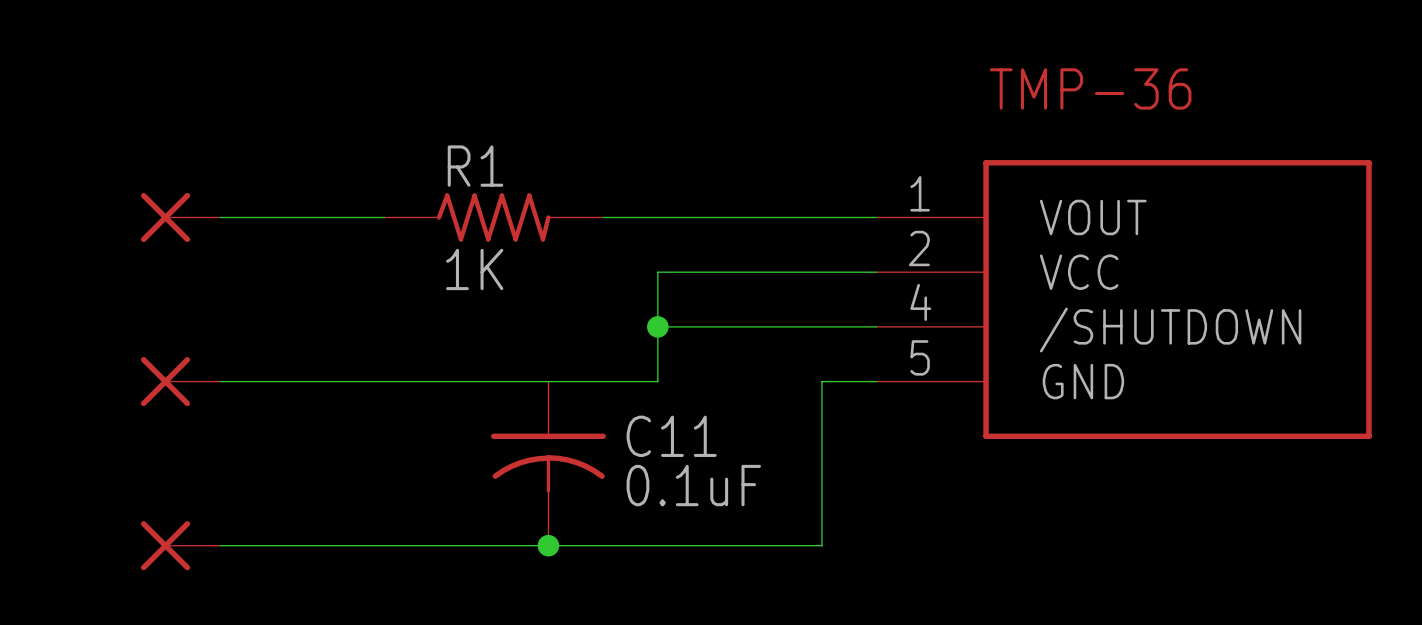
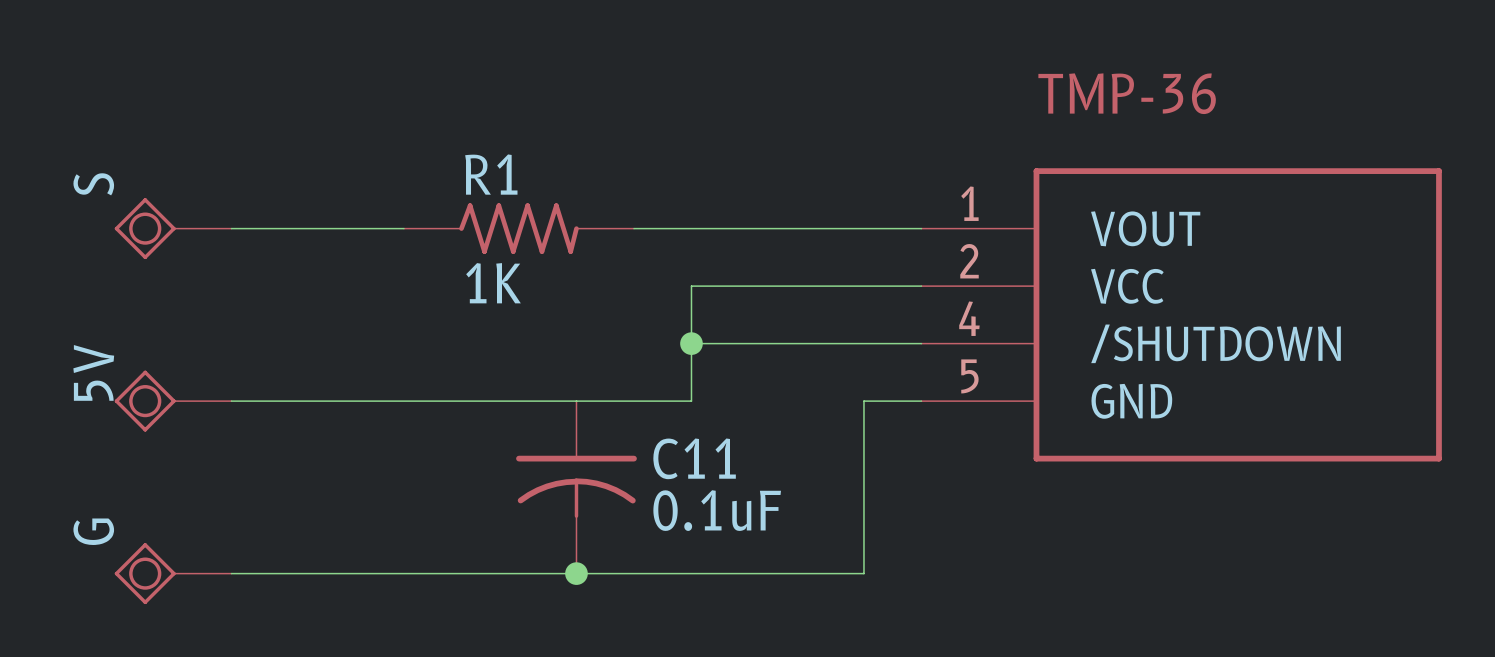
S: none -> (173, 228)
part: (180, 217) -> none
5V: none -> (173, 401)
part: (180, 381) -> none
G: none -> (173, 573)
part: (180, 545) -> none

